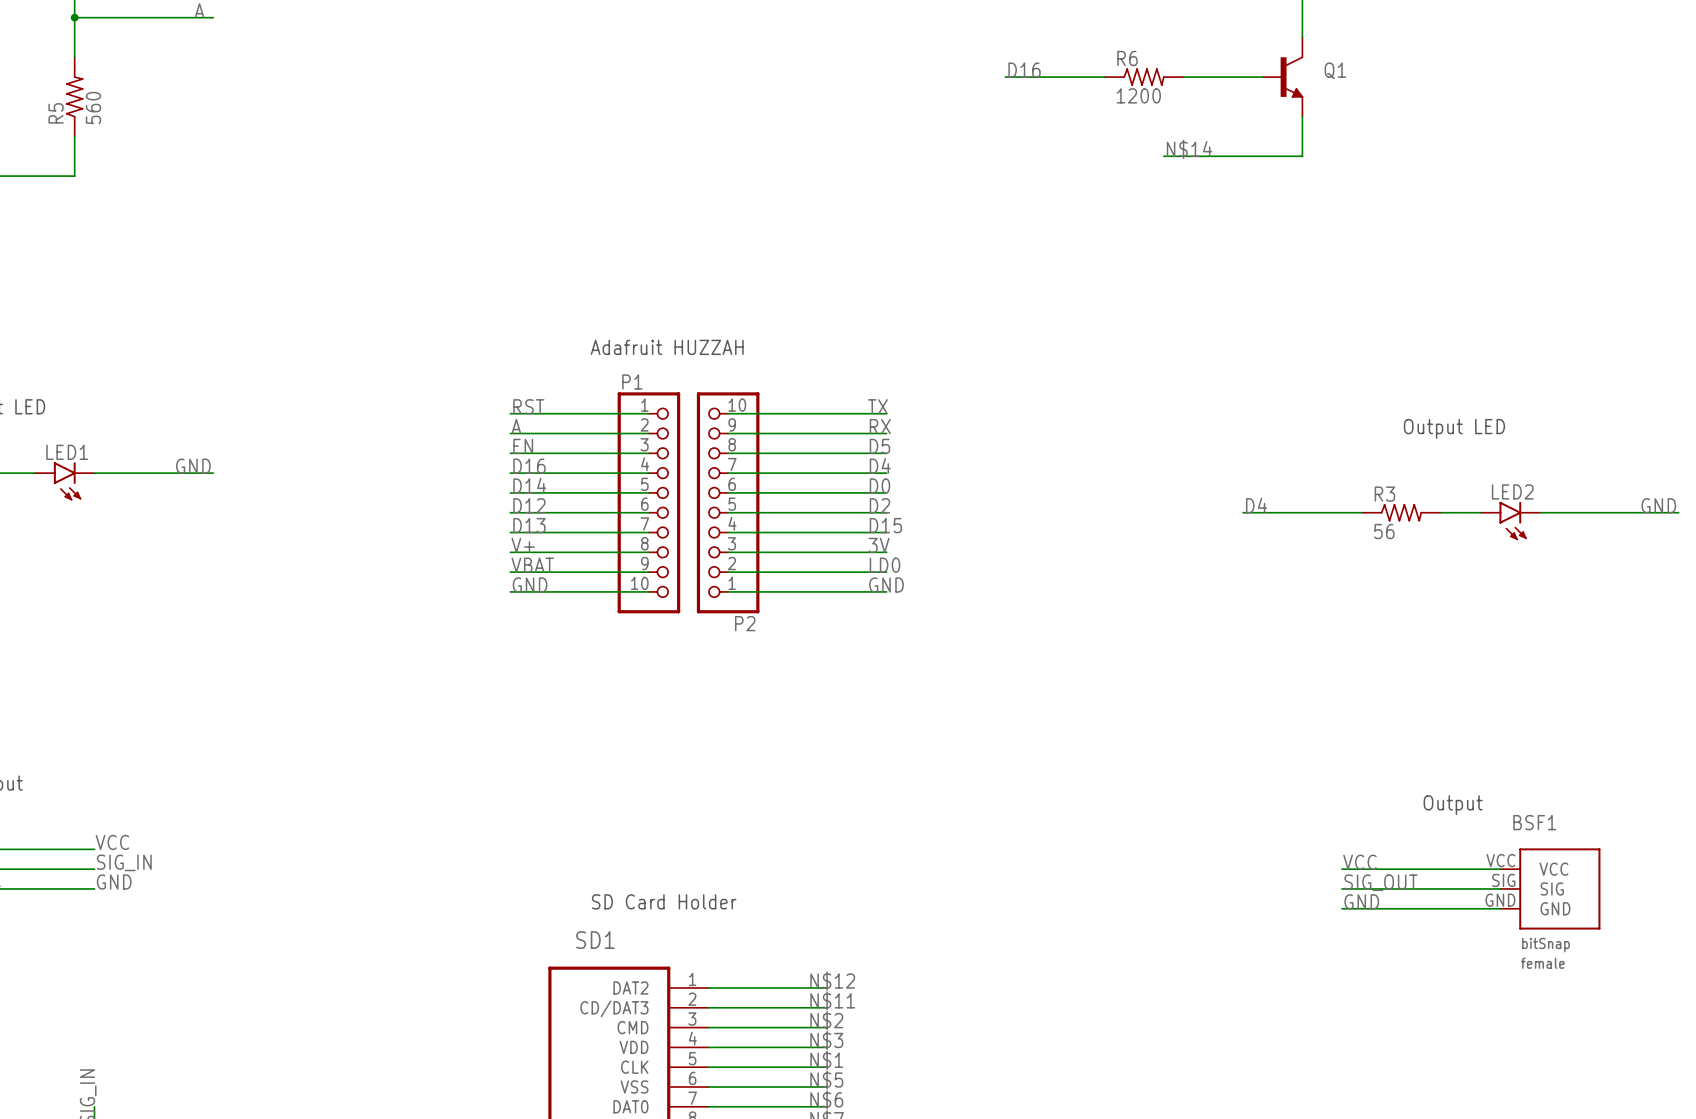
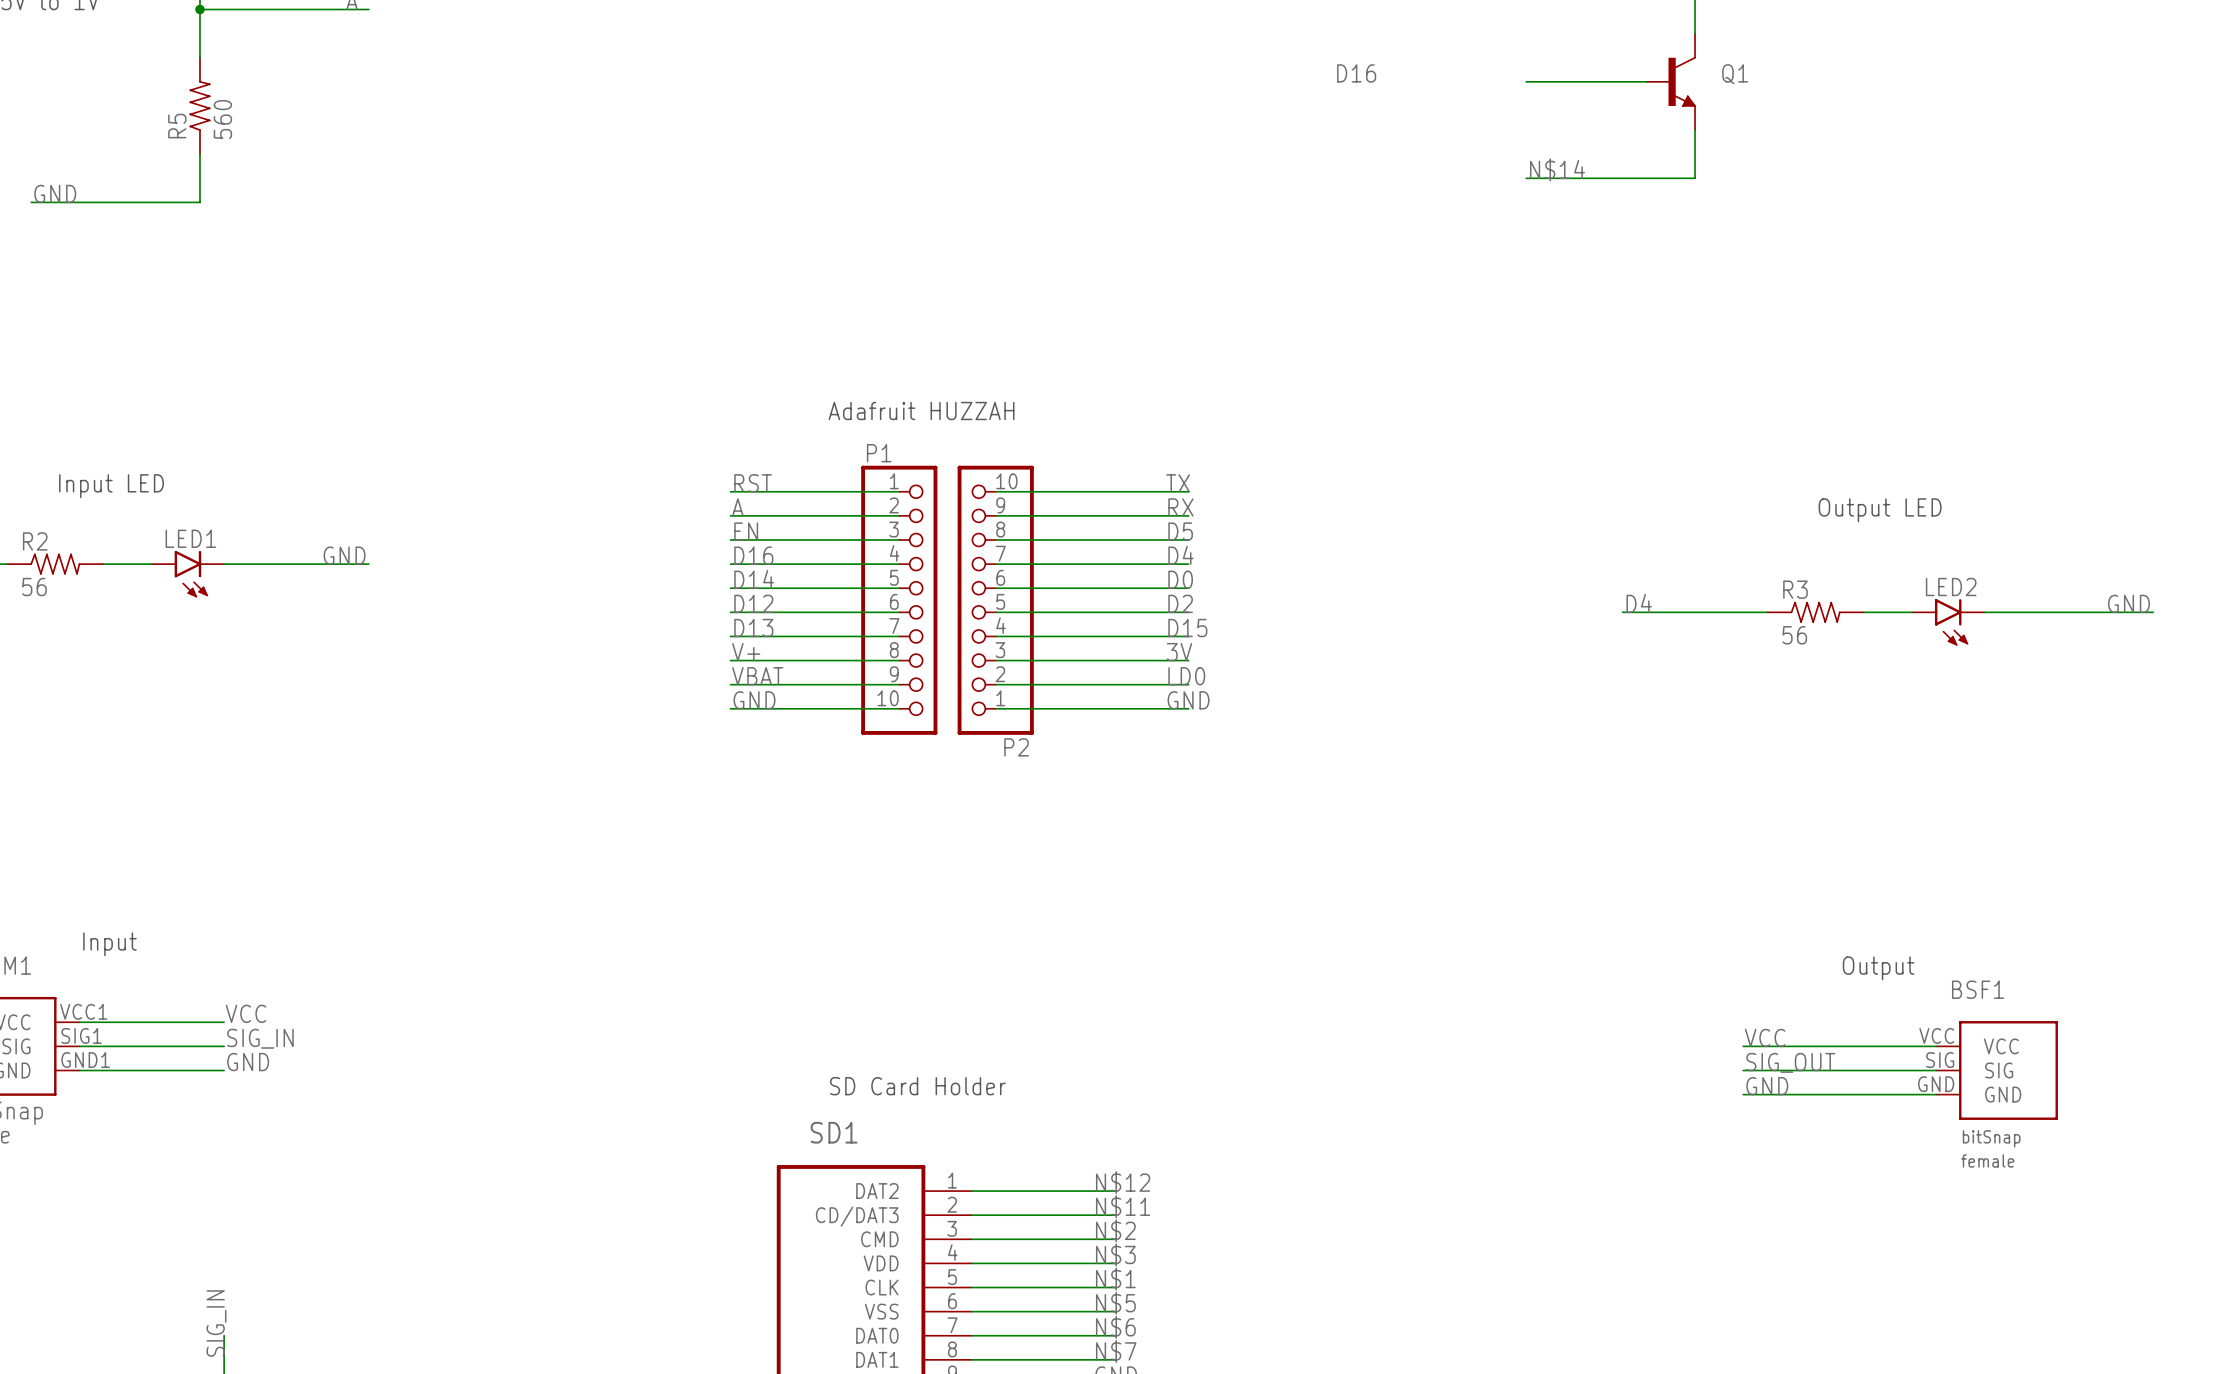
wire: (1005, 77) (1104, 77) -> none
R6: 1200 (1143, 77) -> none

